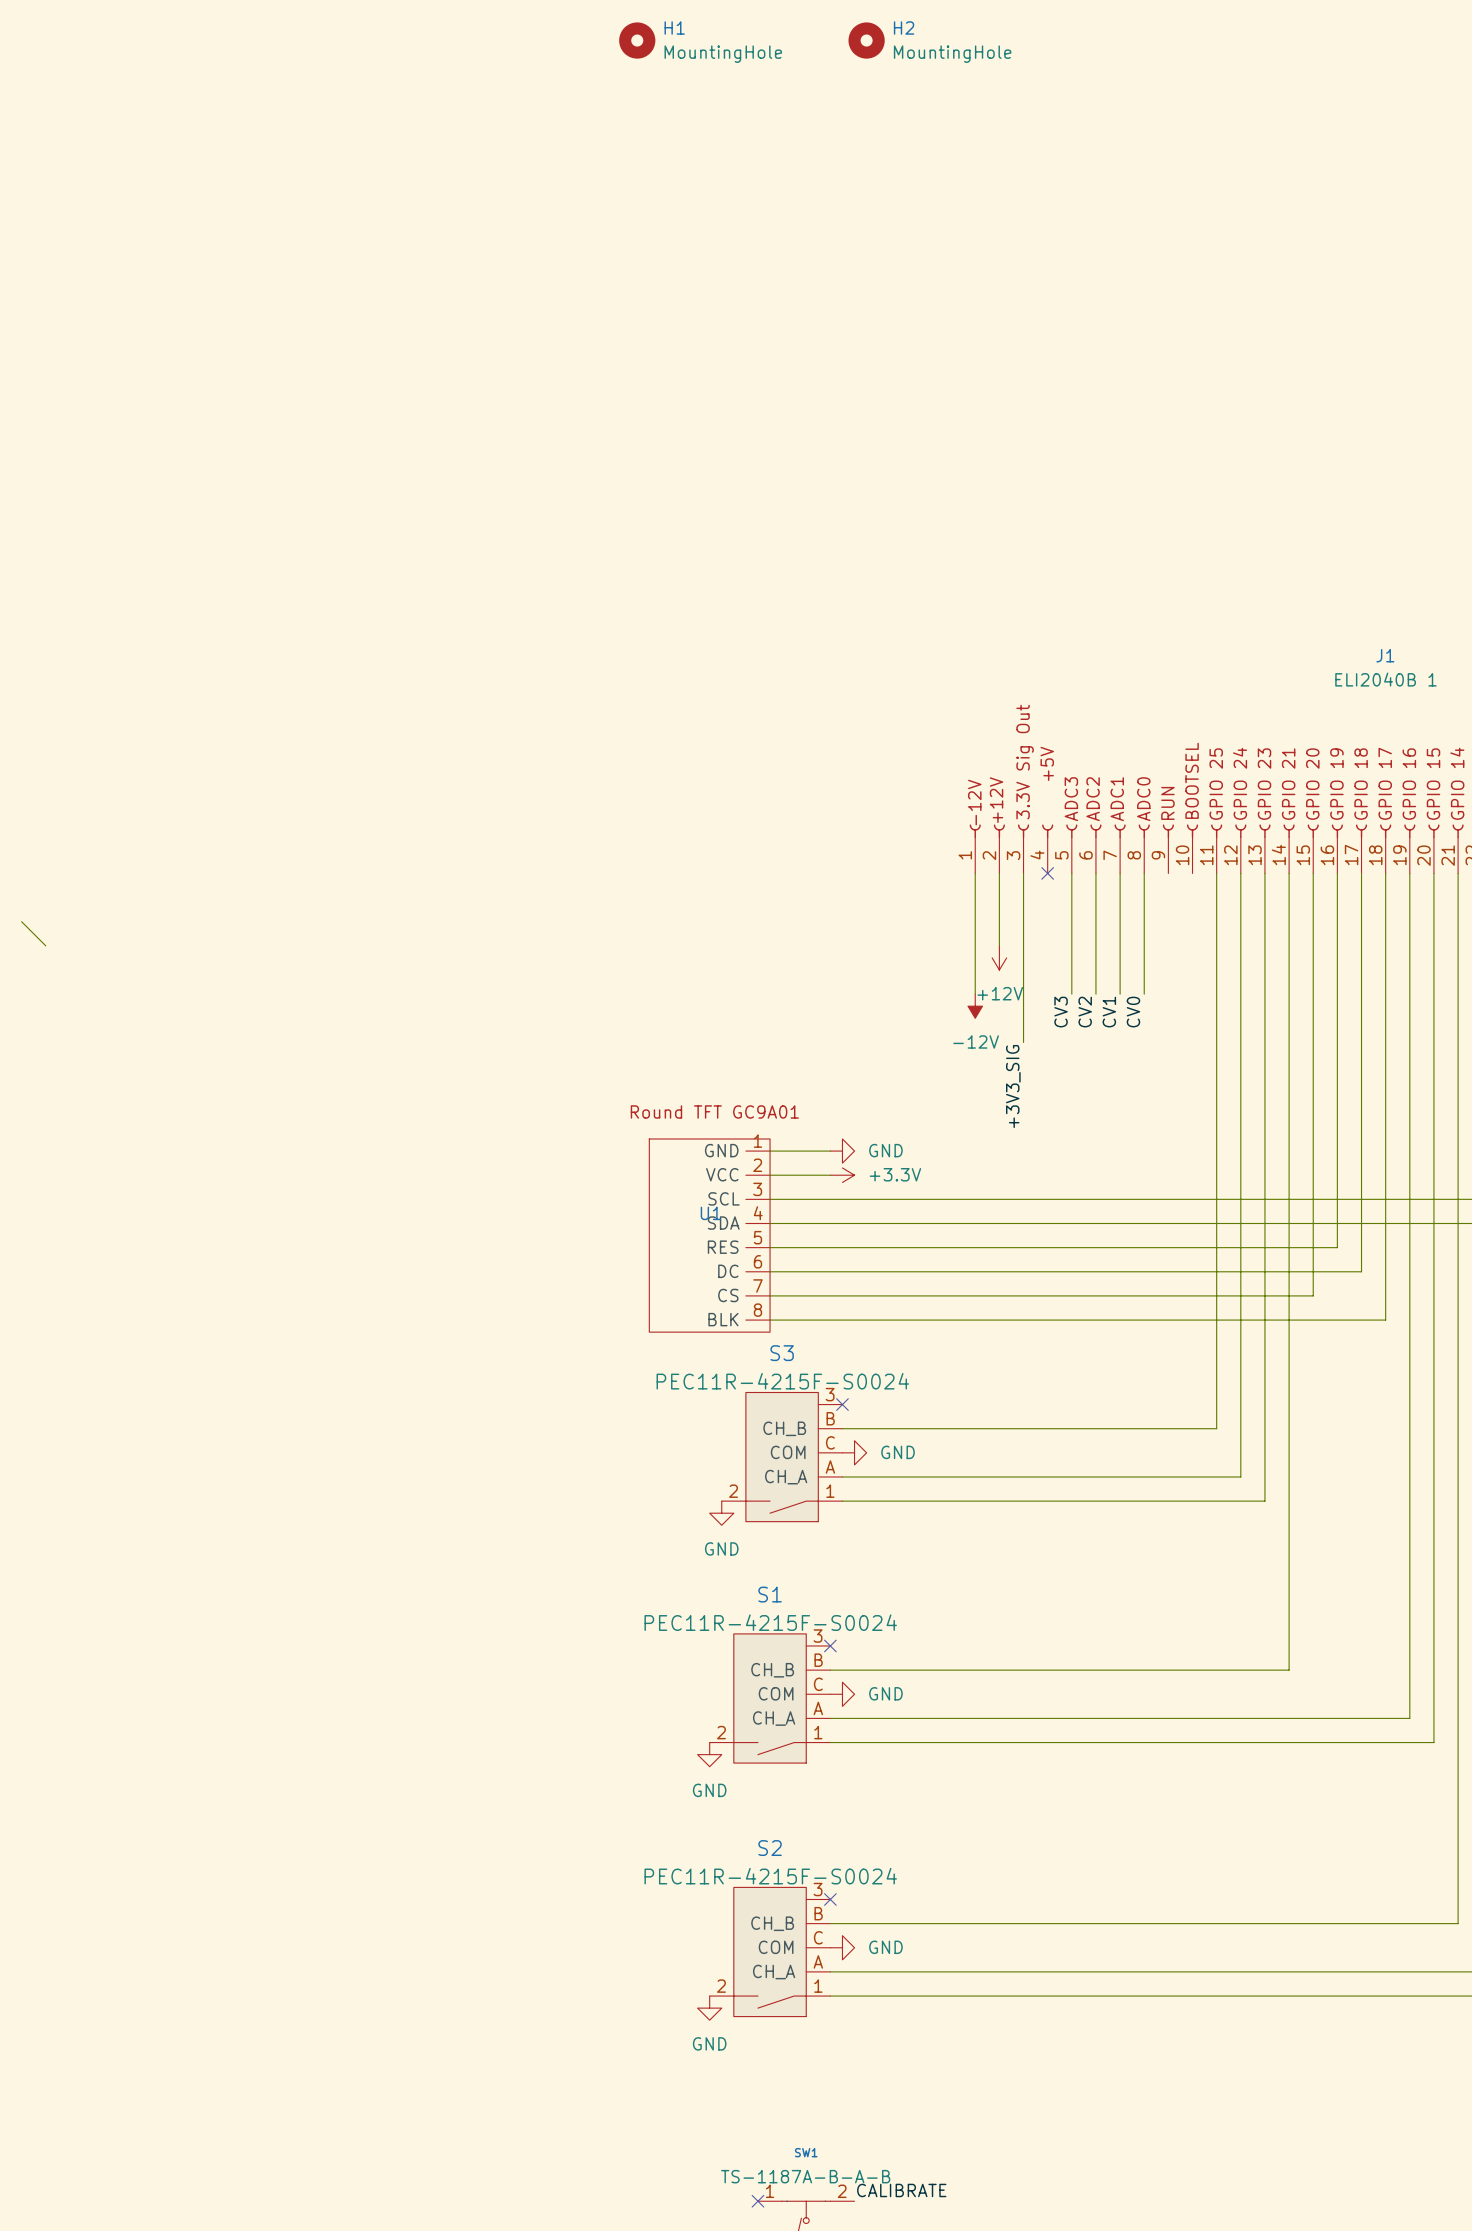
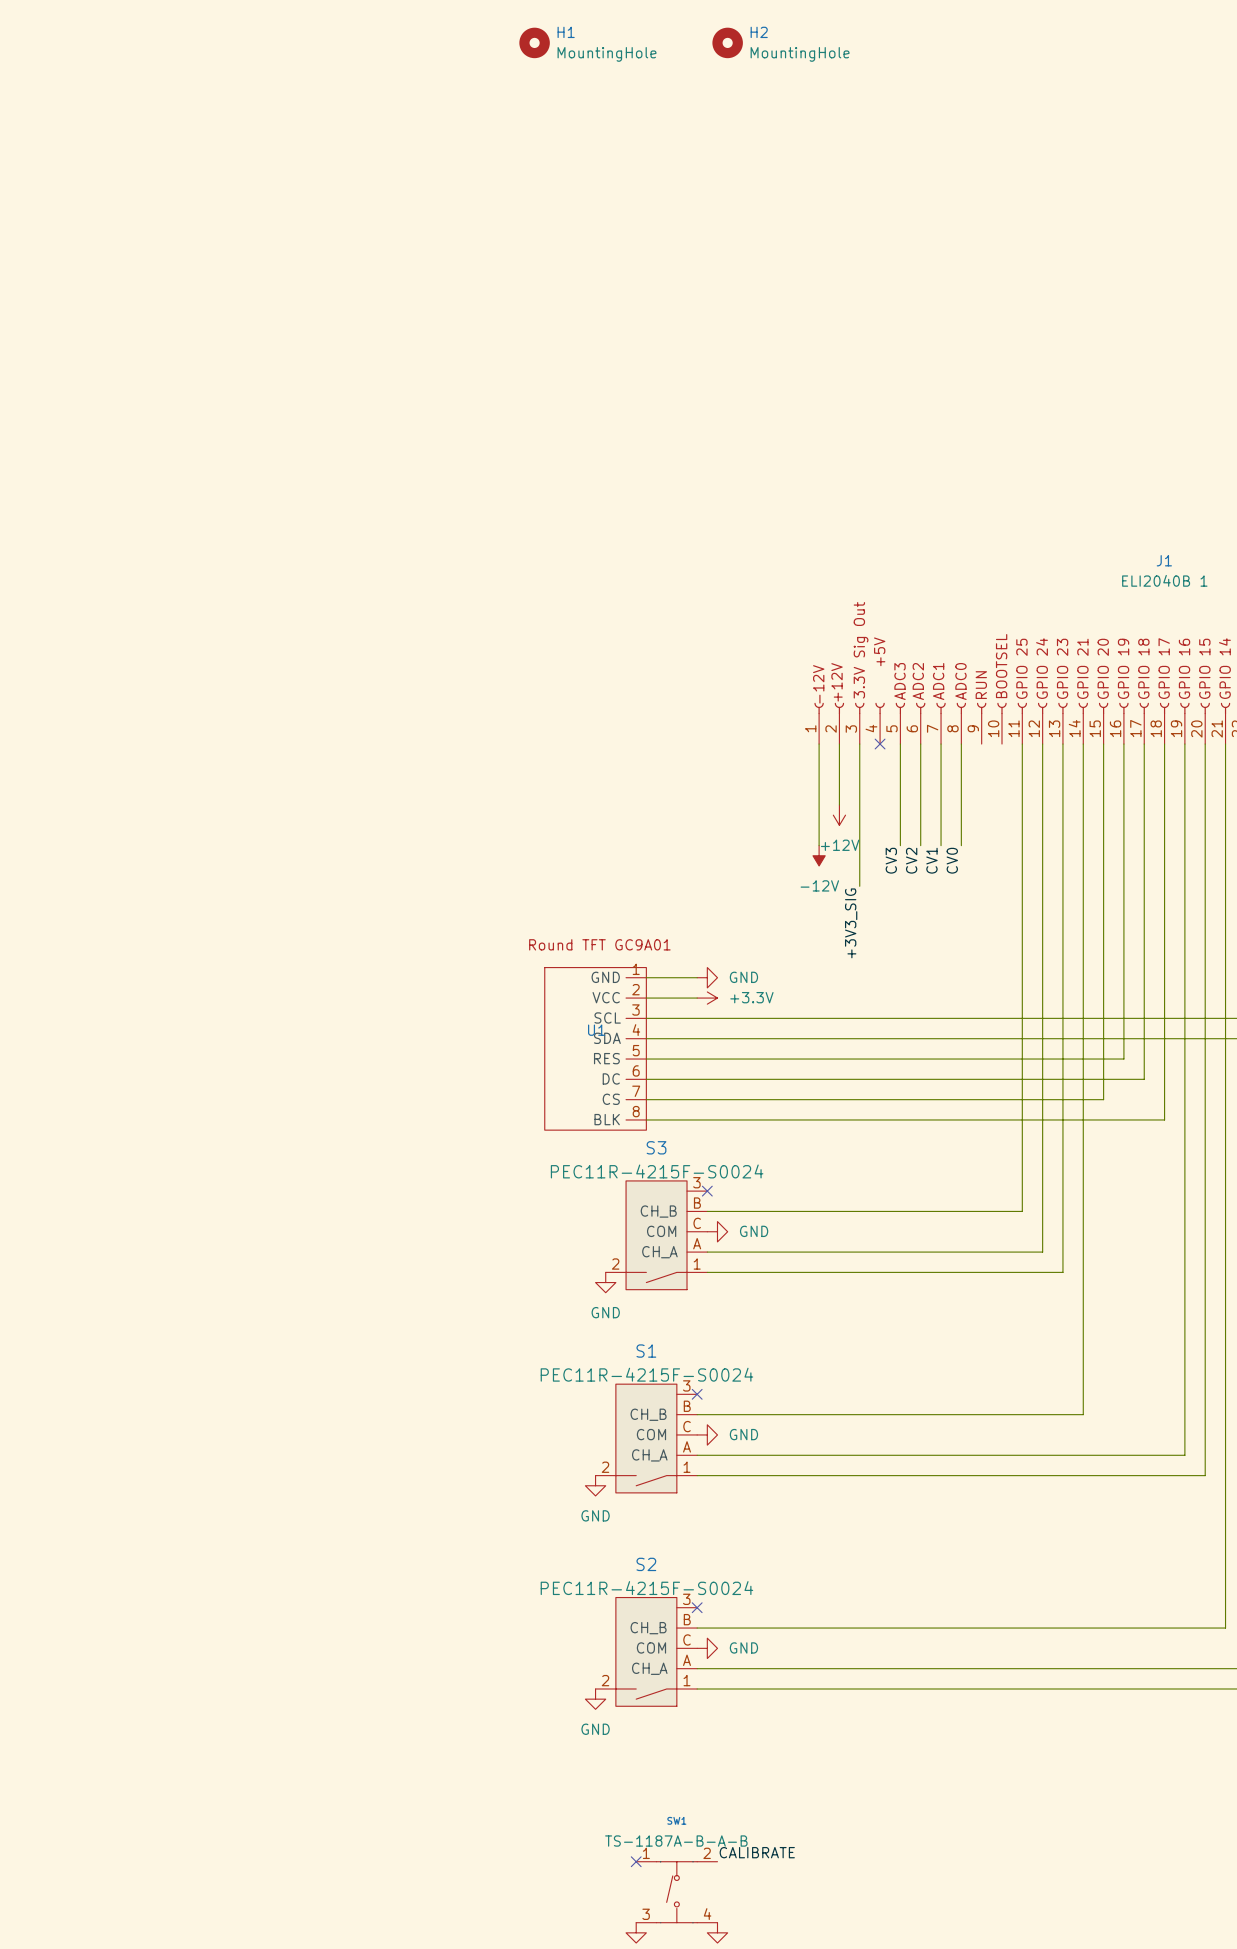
wire: (21, 921) (45, 945) -> none

